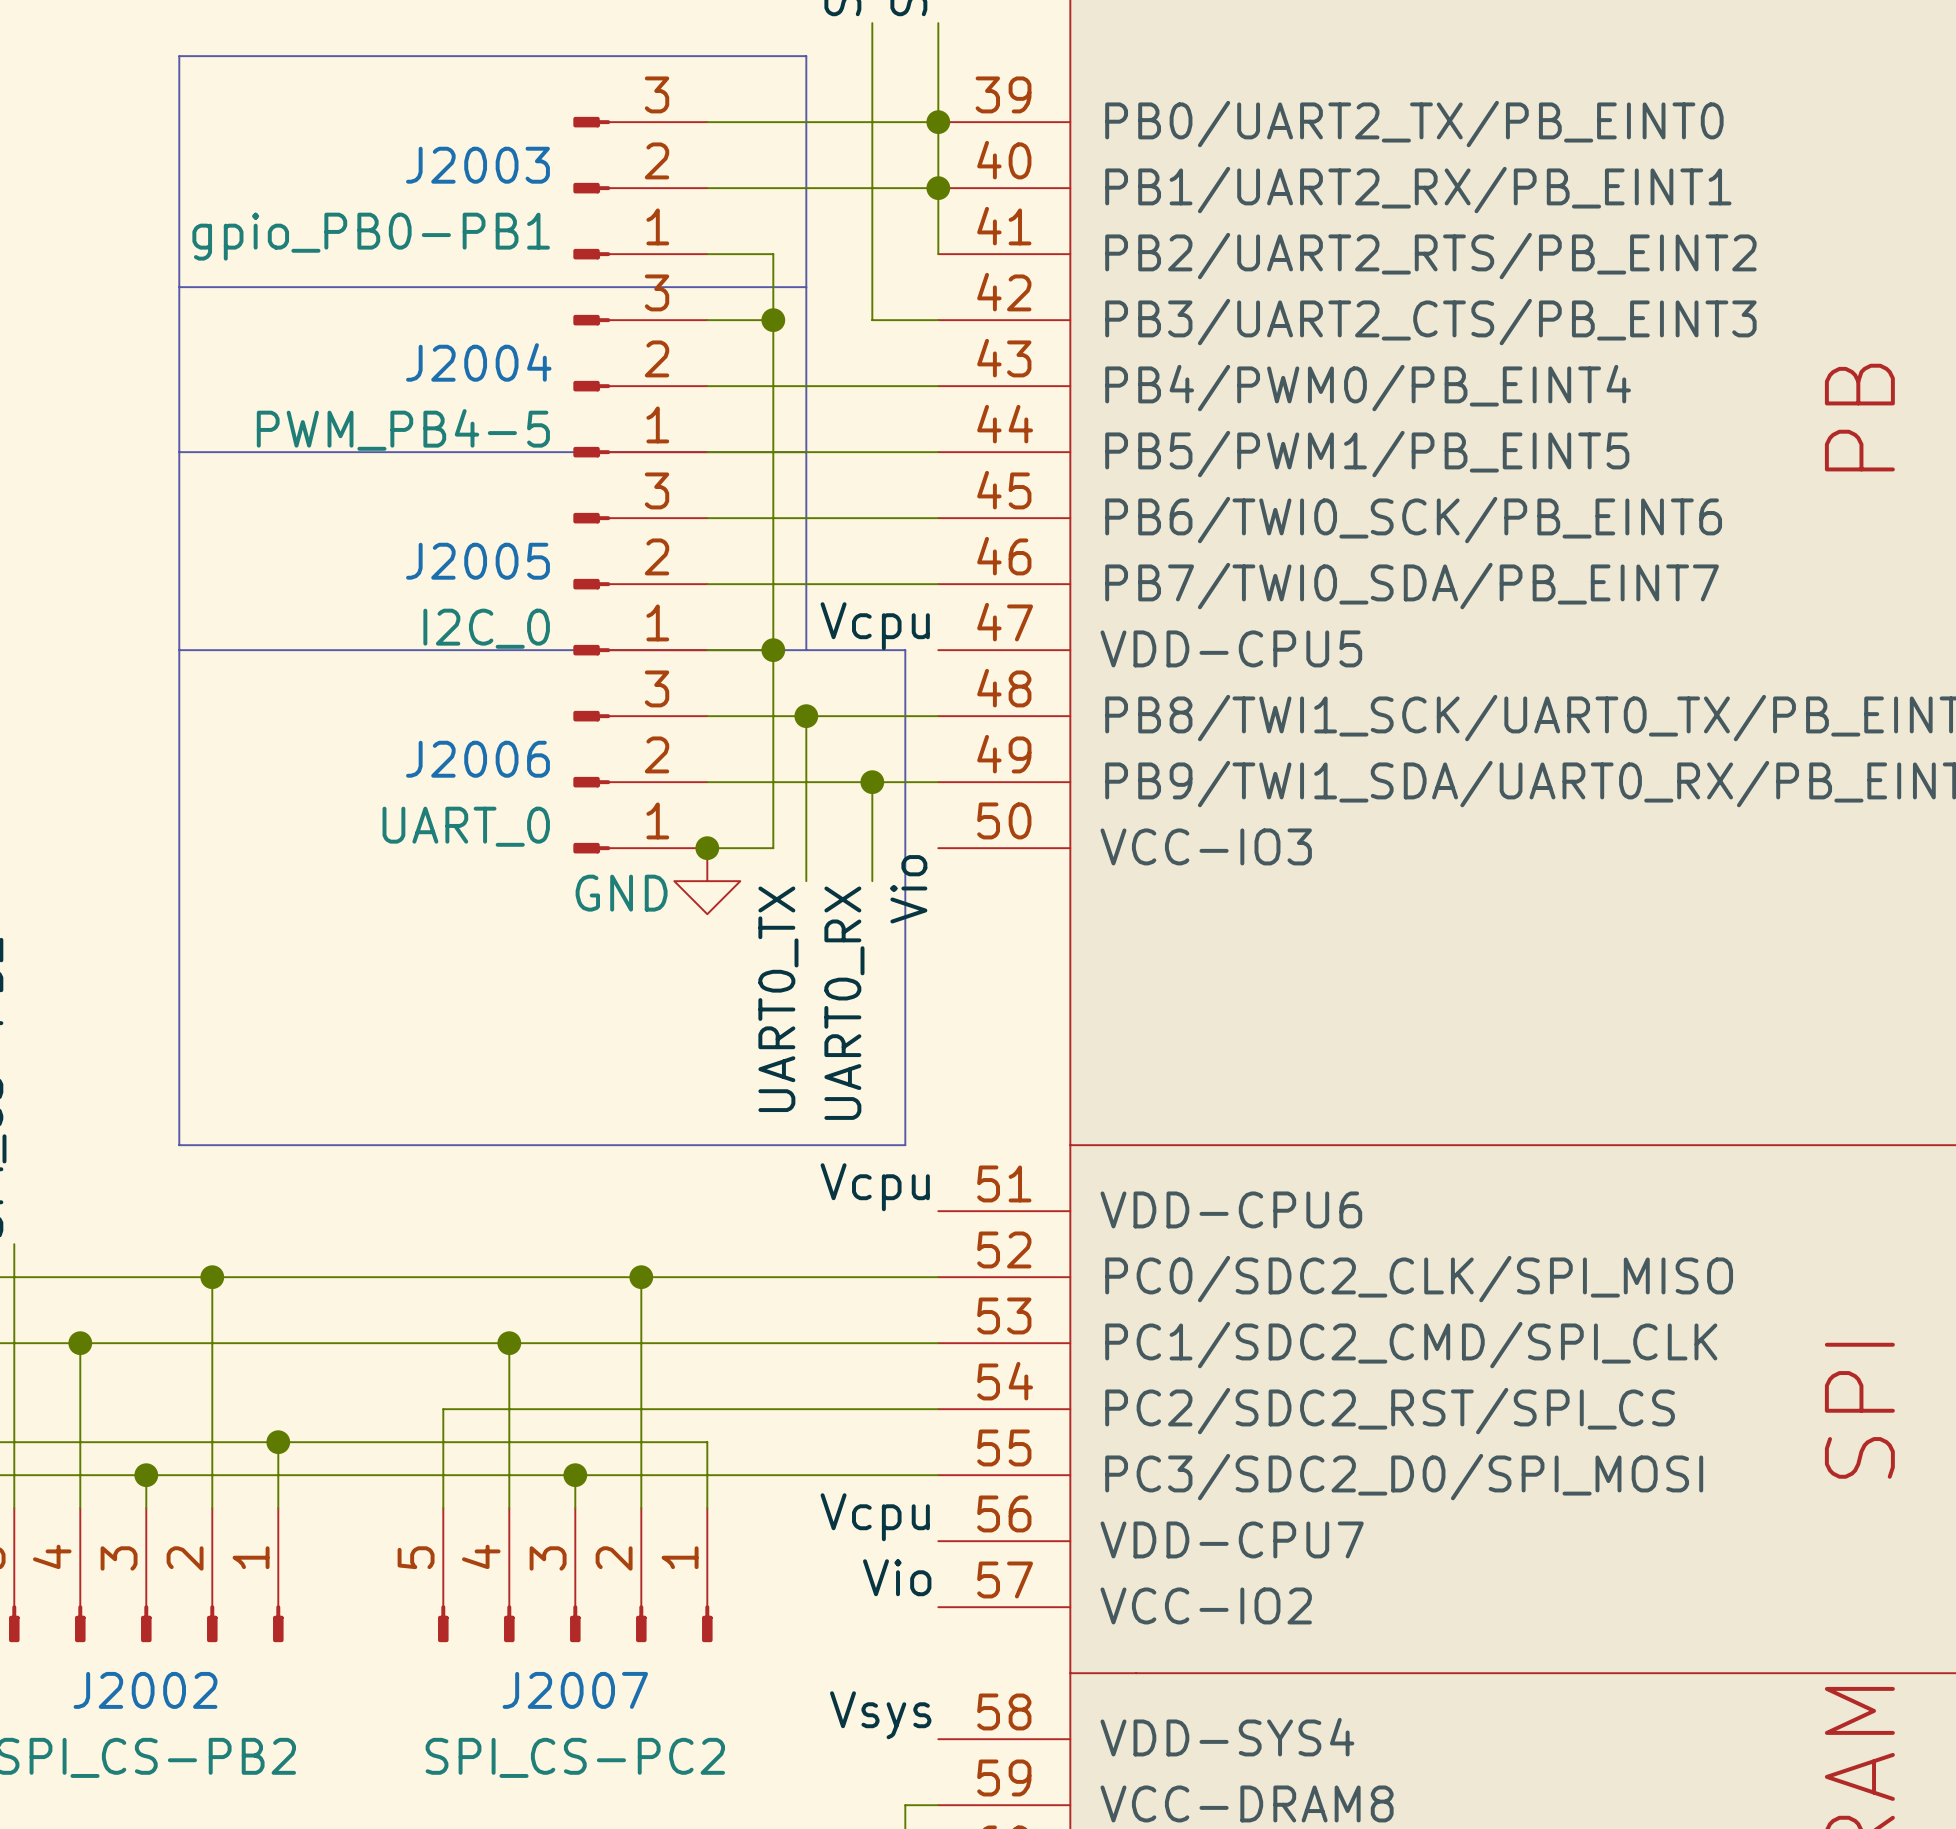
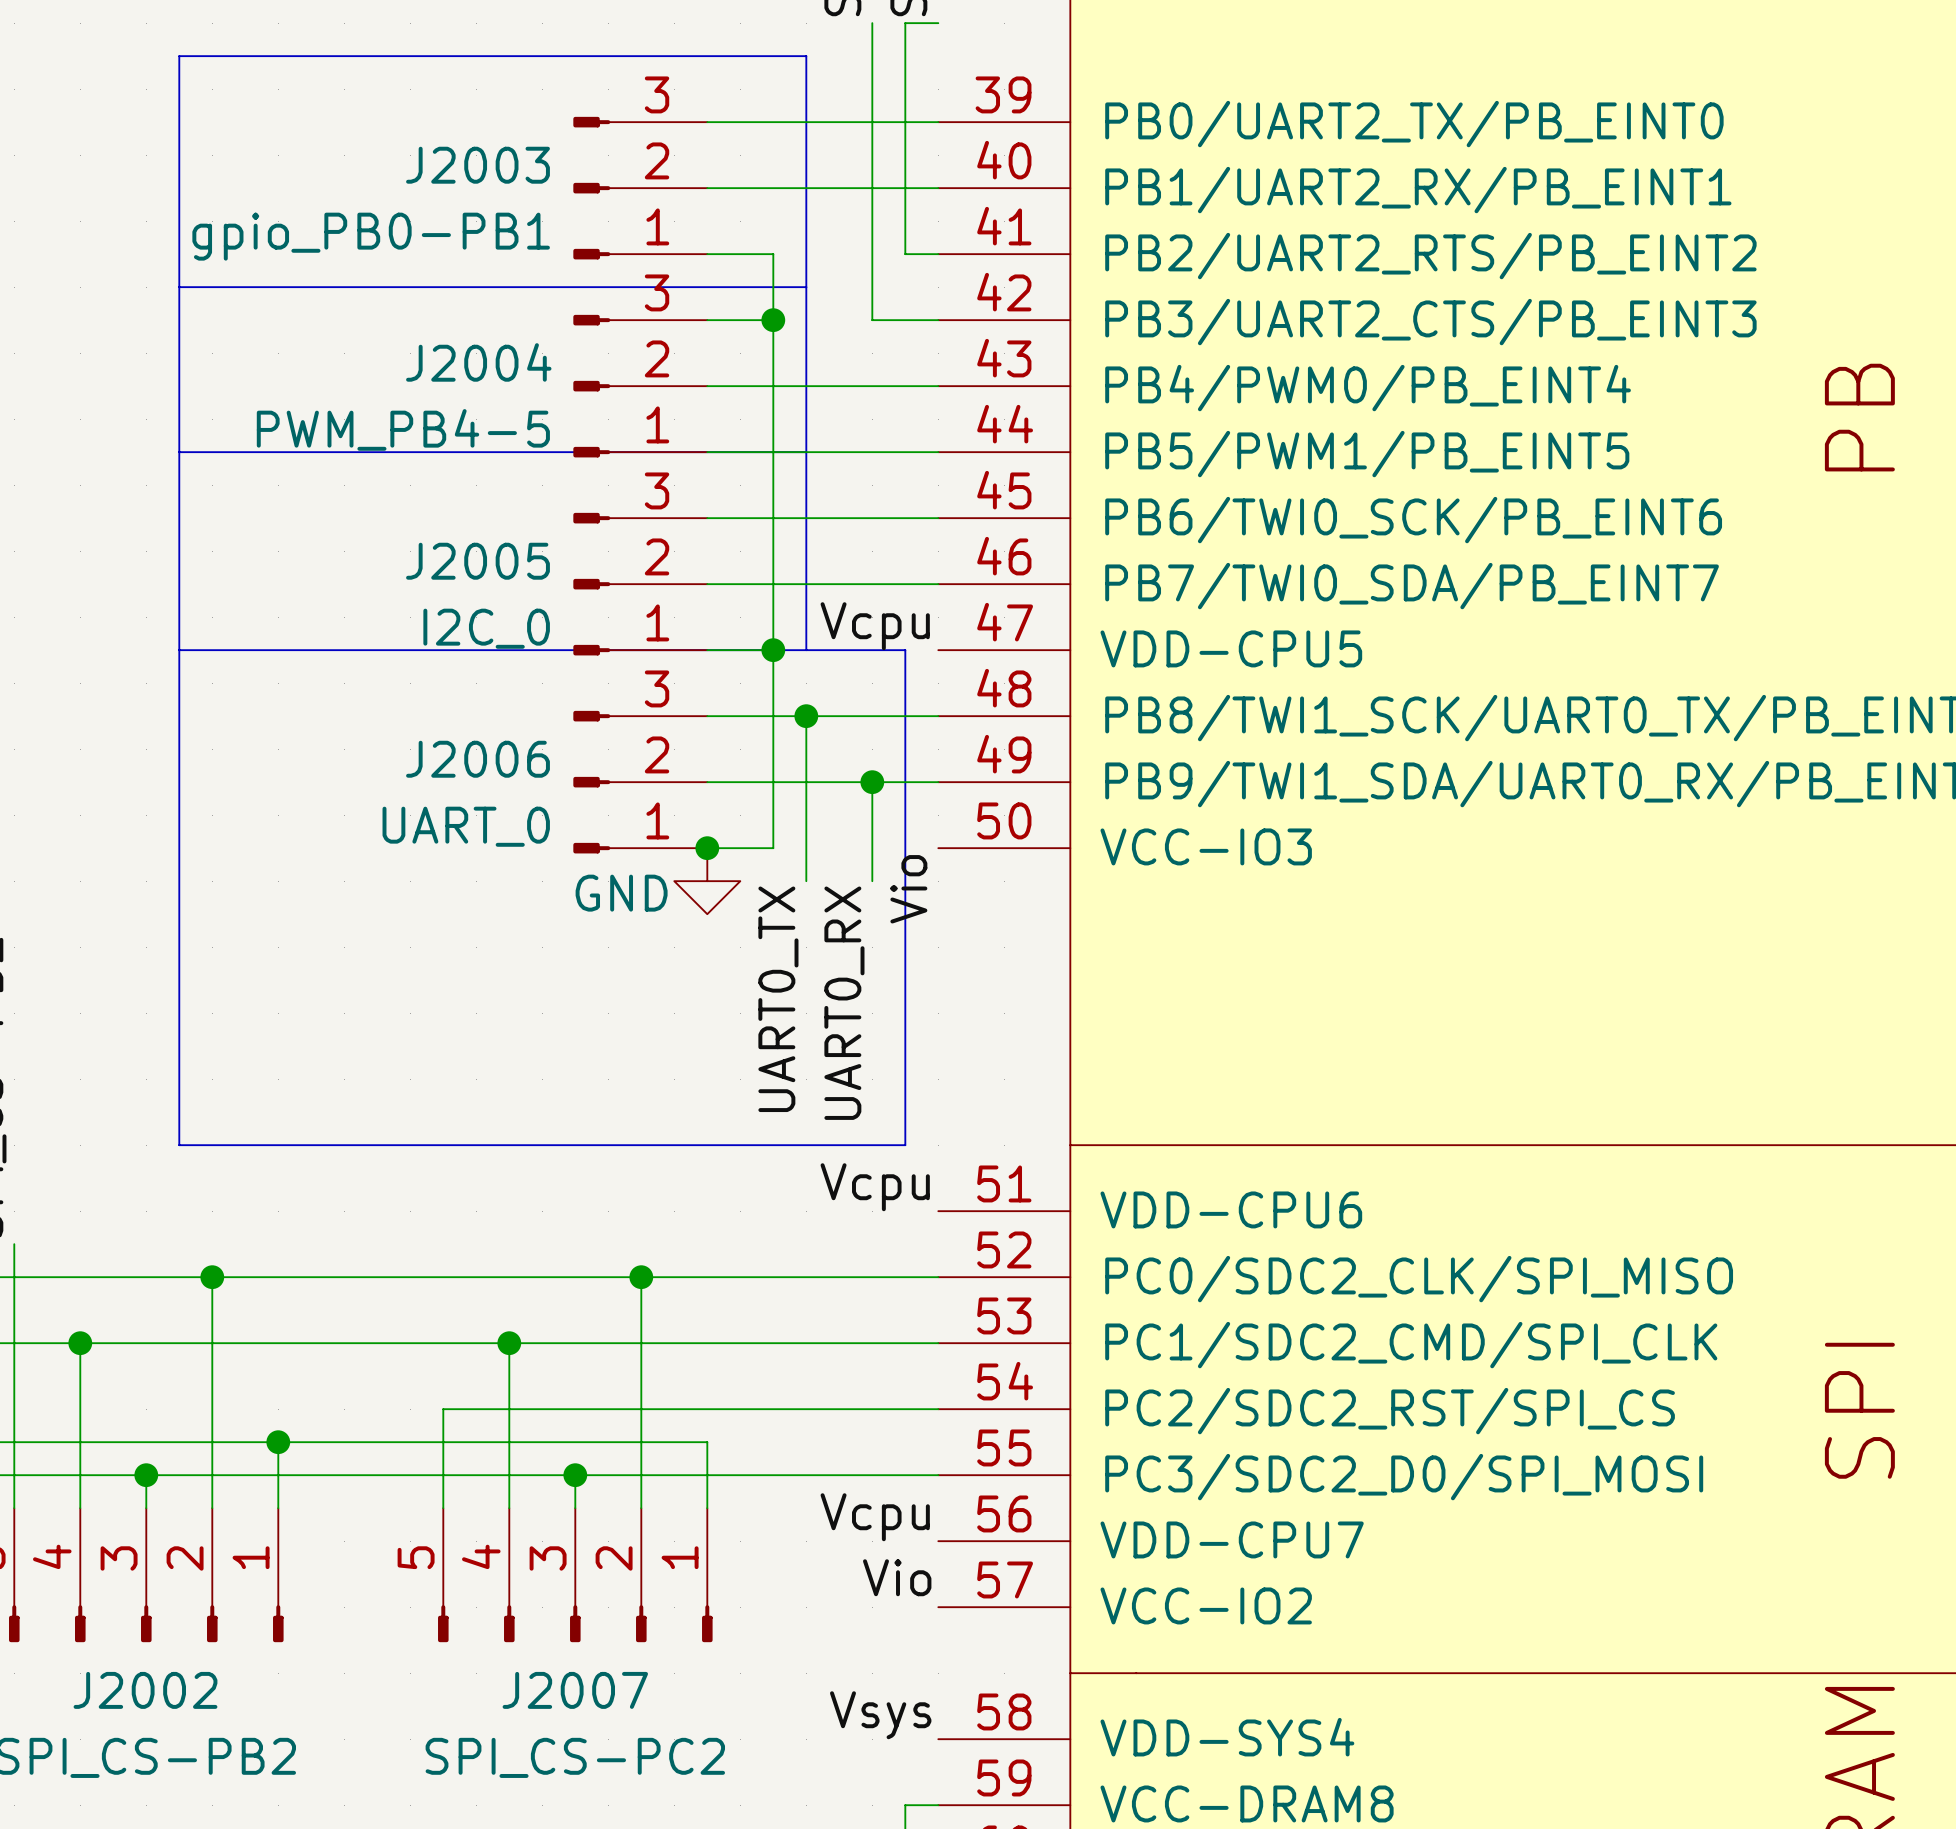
wire: (938, 23) (938, 254) -> (938, 23) (905, 23) (905, 254) (938, 254)
junction: (938, 122) -> none
junction: (938, 188) -> none

